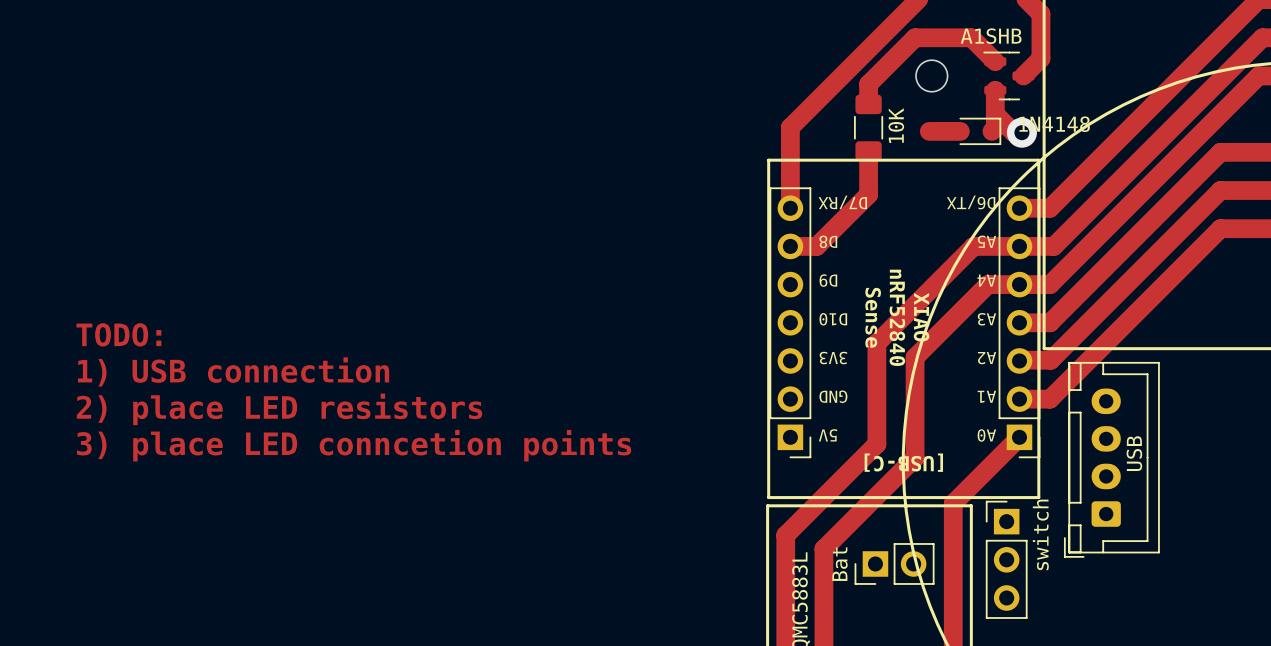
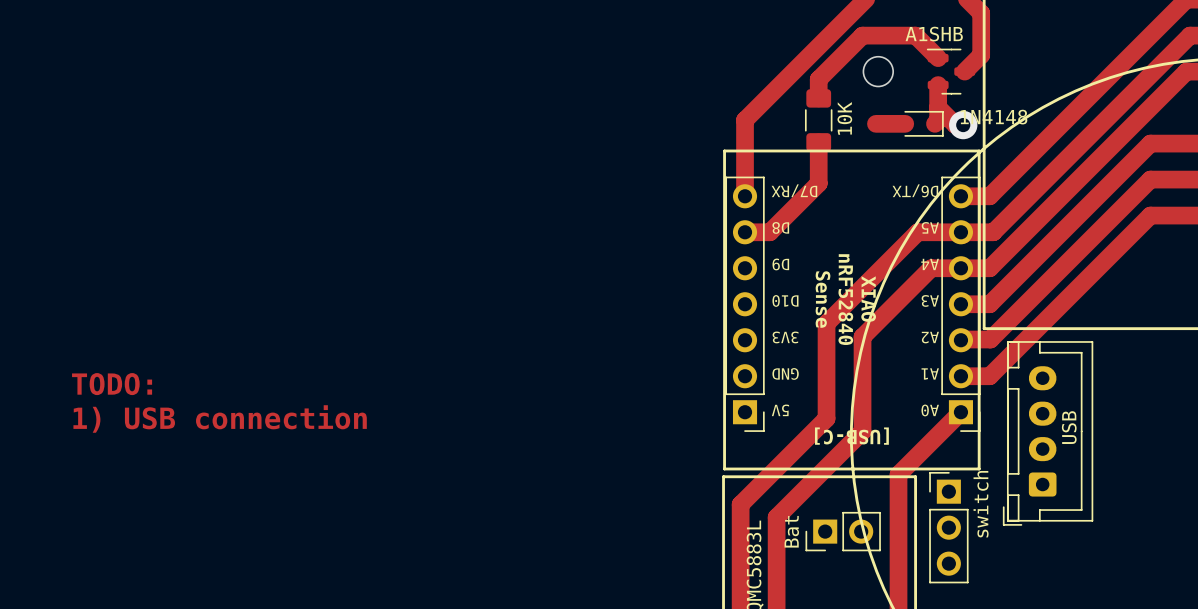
text: TODO: (118, 334) -> none
text: 1) USB connection (233, 371) -> none
text: 2) place LED resistors (279, 409) -> TODO: (112, 384)
text: 3) place LED conncetion points (354, 445) -> 1) USB connection (220, 418)

